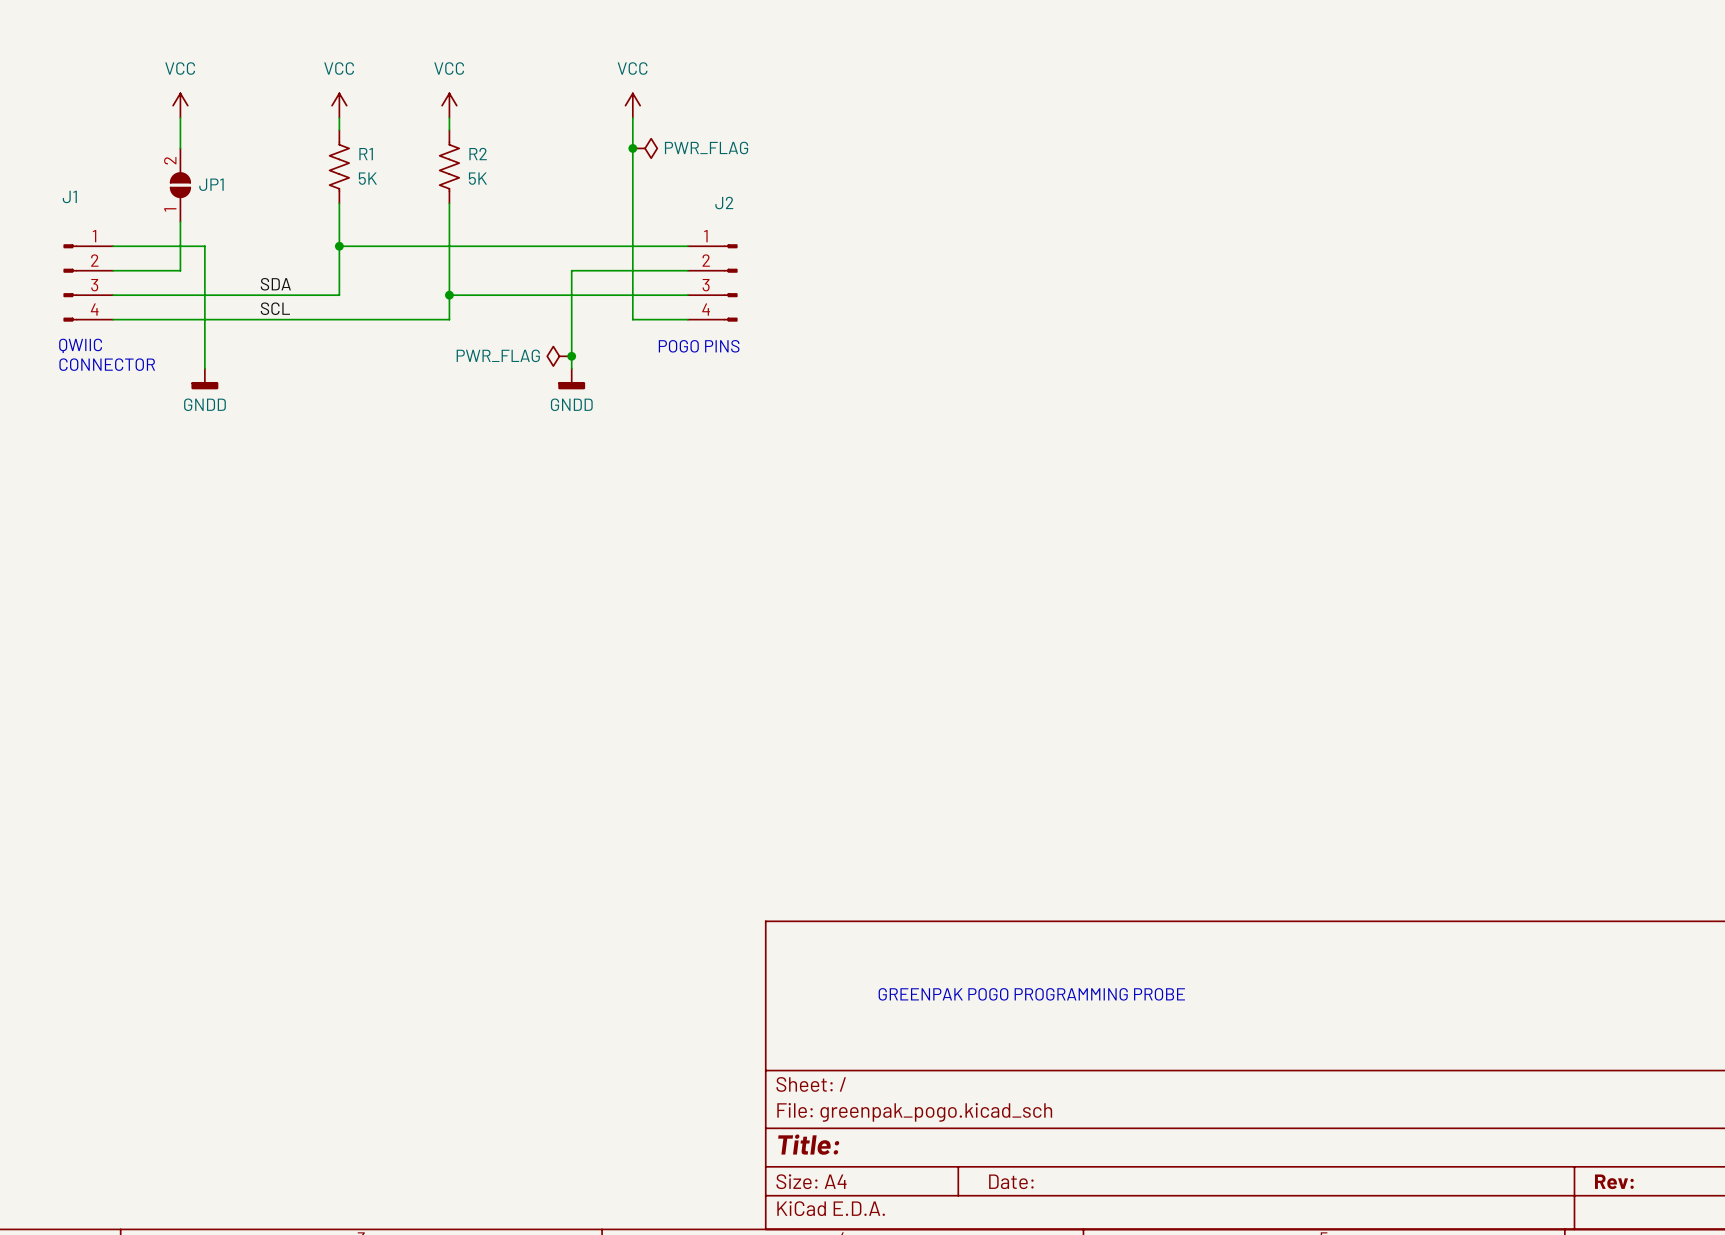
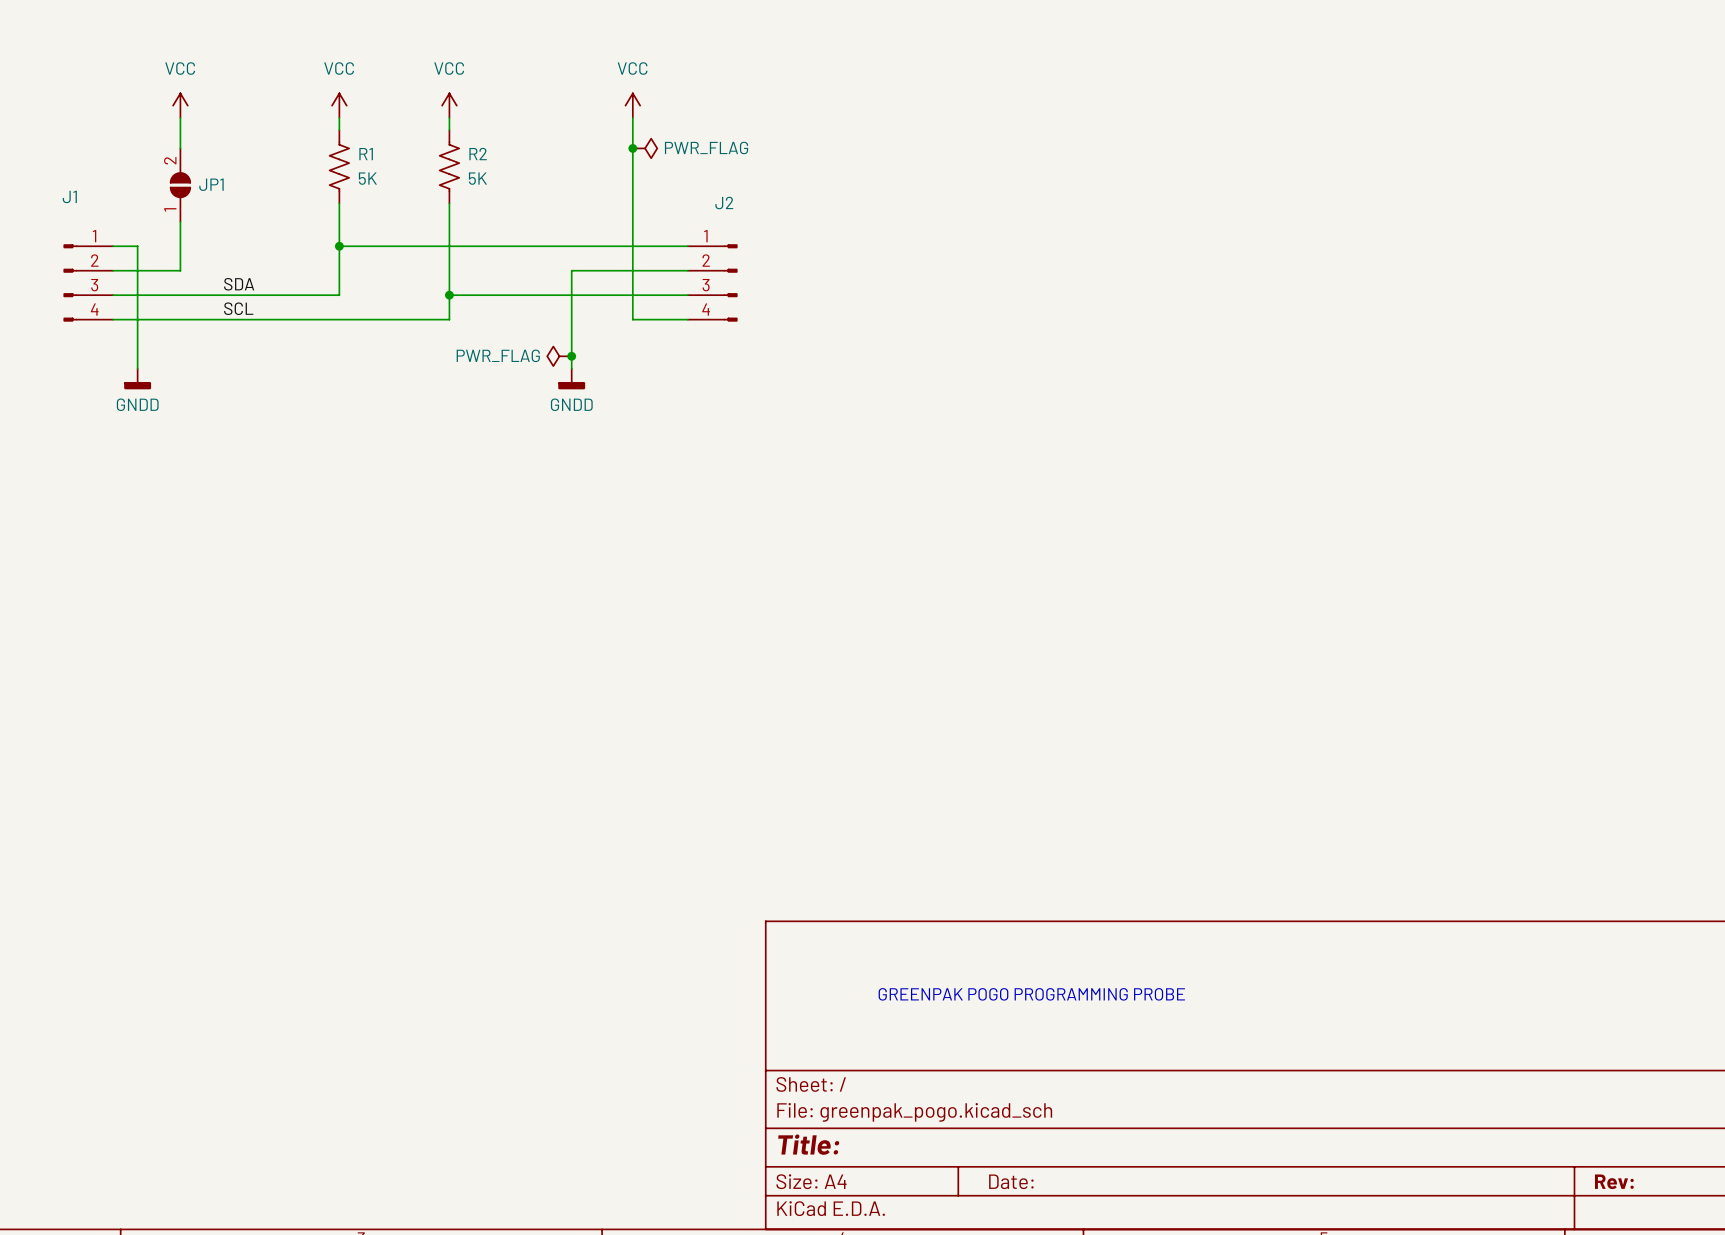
wire: (137, 246) (204, 246) (204, 368) -> (137, 246) (137, 368)
label position: SDA (275, 284) -> SDA (239, 284)
label position: SCL (275, 308) -> SCL (238, 308)
text: QWIIC (80, 345) -> none
text: POGO PINS (699, 346) -> none
text: CONNECTOR (107, 364) -> none
power symbol position: GNDD (204, 378) -> GNDD (137, 378)

